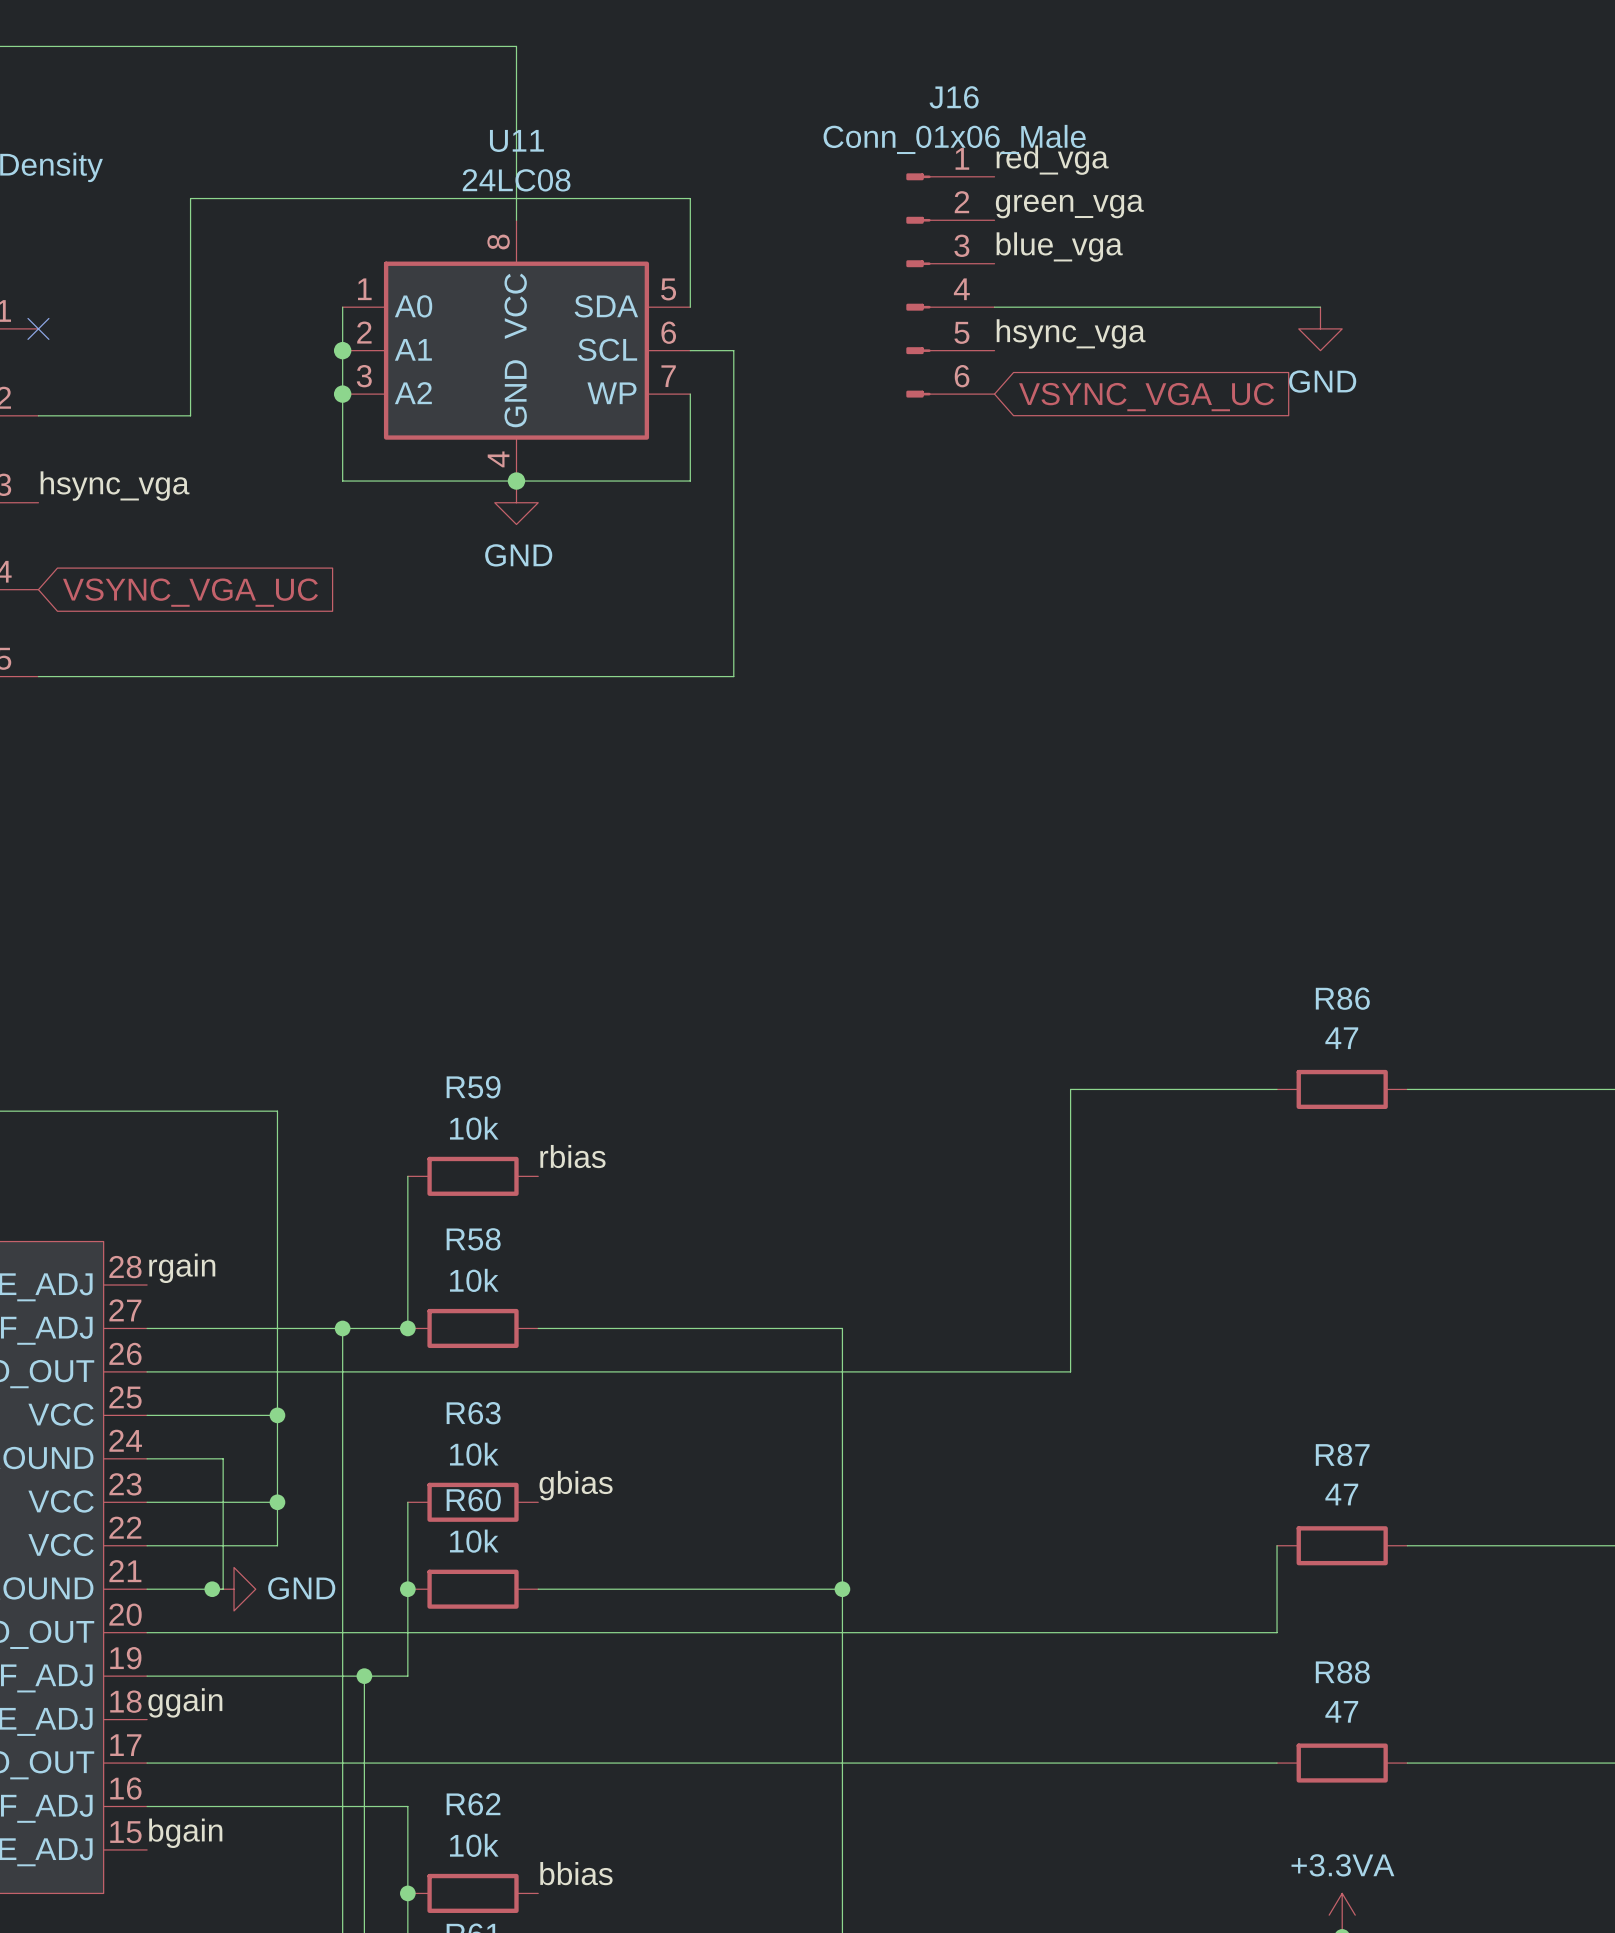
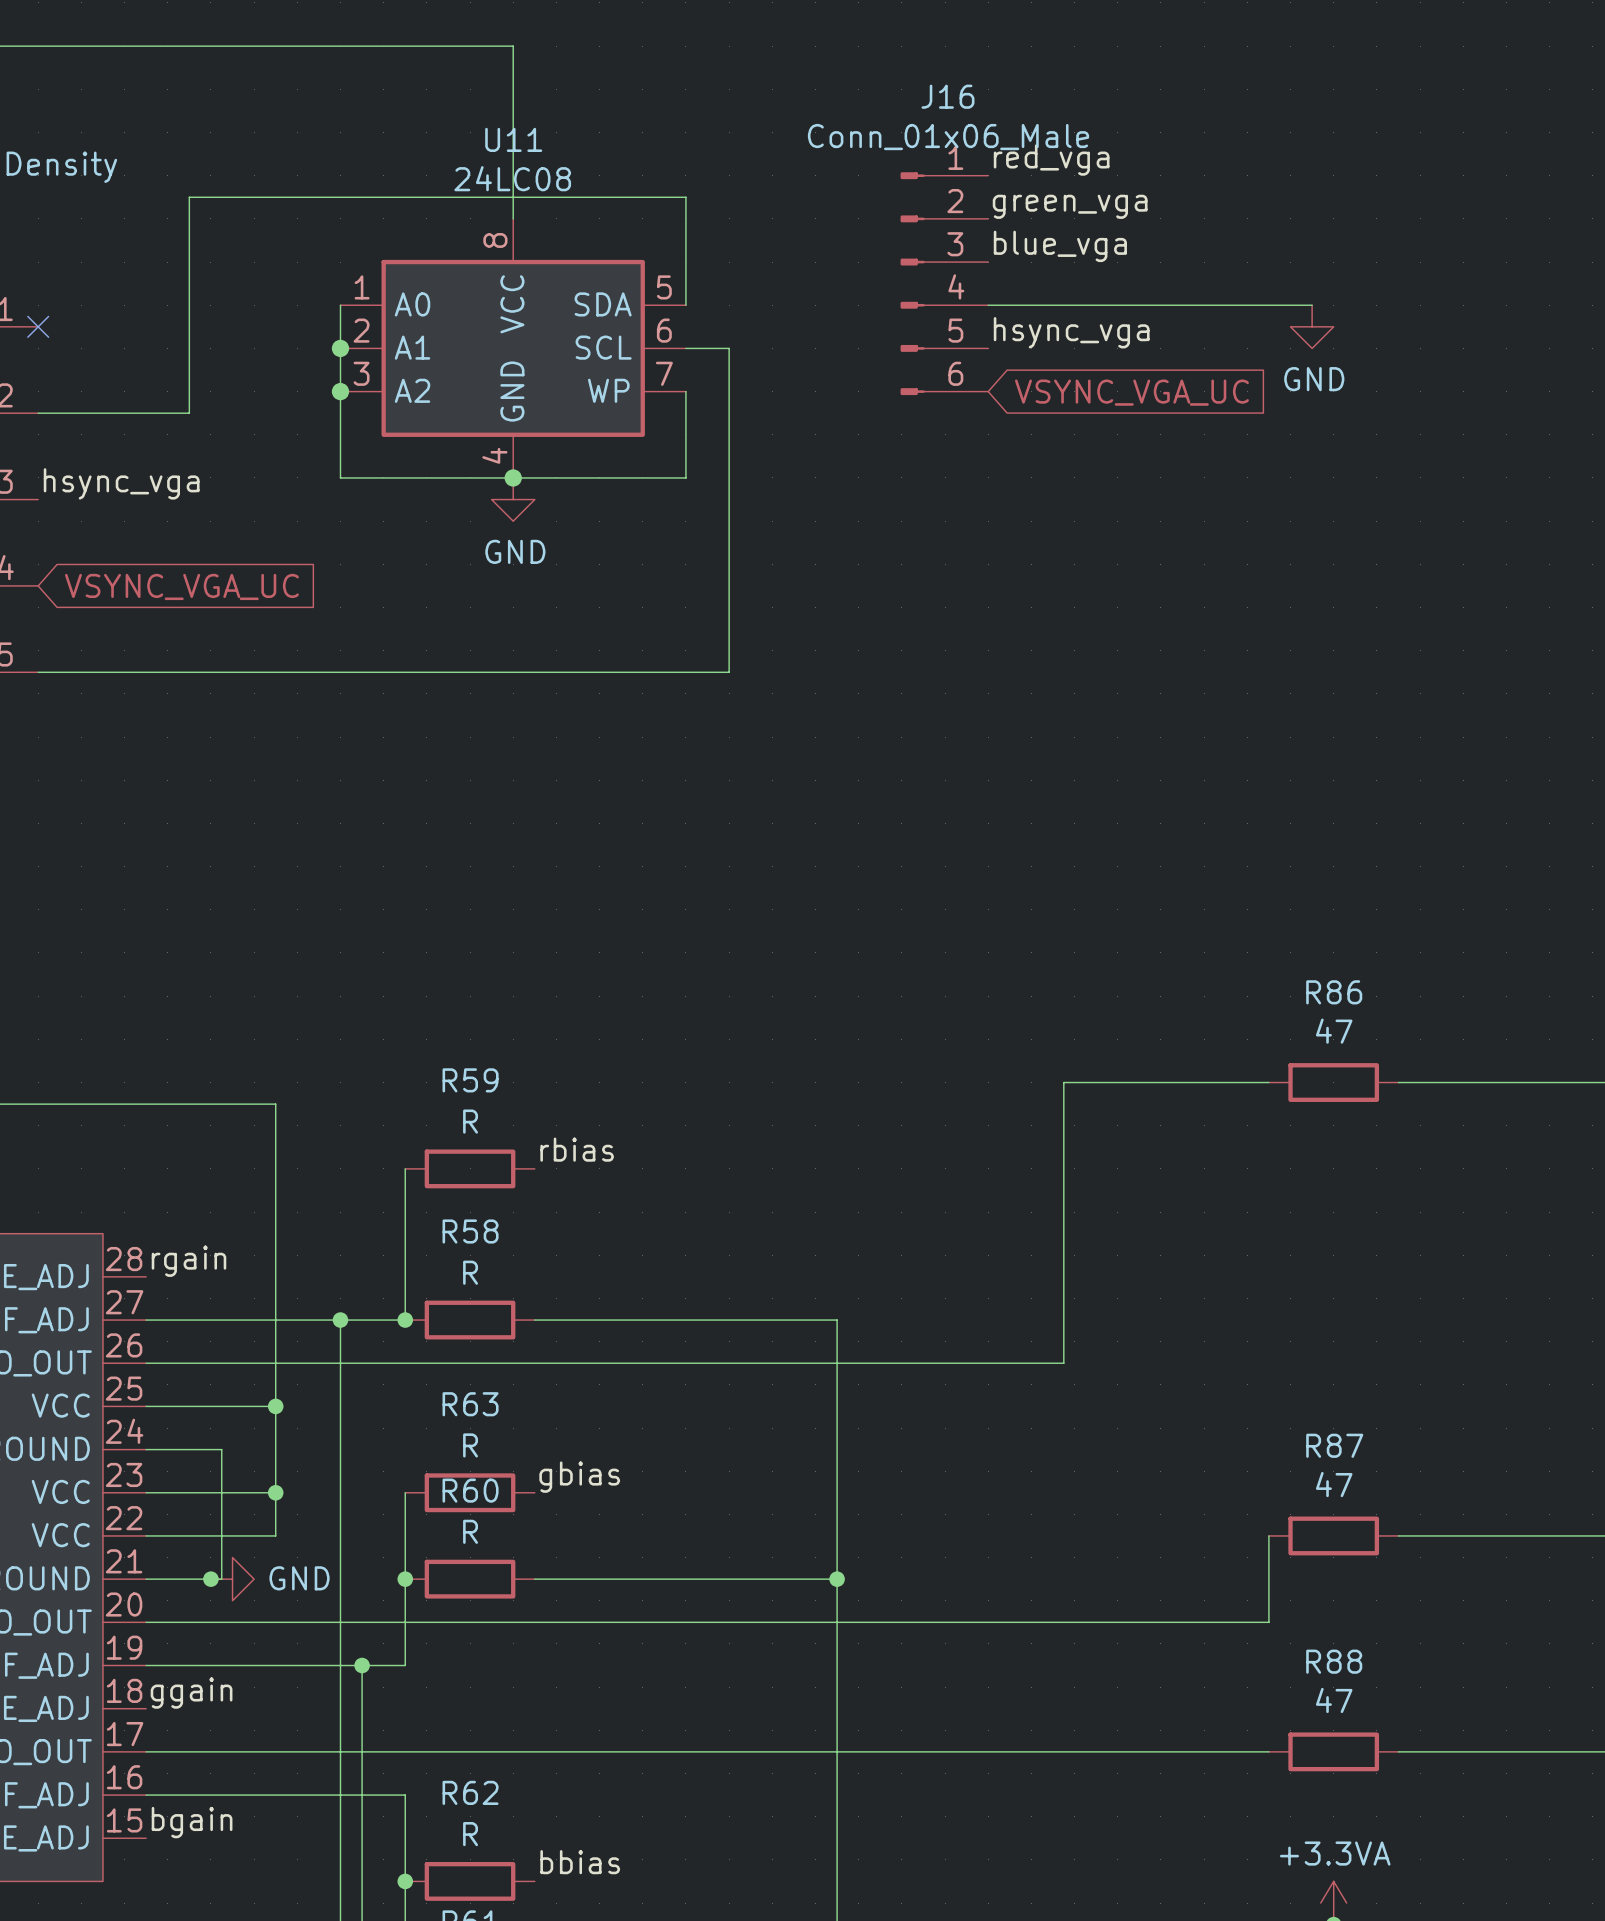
R59 value: 10k (474, 1128) -> R (470, 1121)
R58 value: 10k (474, 1280) -> R (470, 1272)
R63 value: 10k (474, 1454) -> R (470, 1445)
R60 value: 10k (474, 1541) -> R (470, 1531)
R62 value: 10k (474, 1845) -> R (470, 1834)

